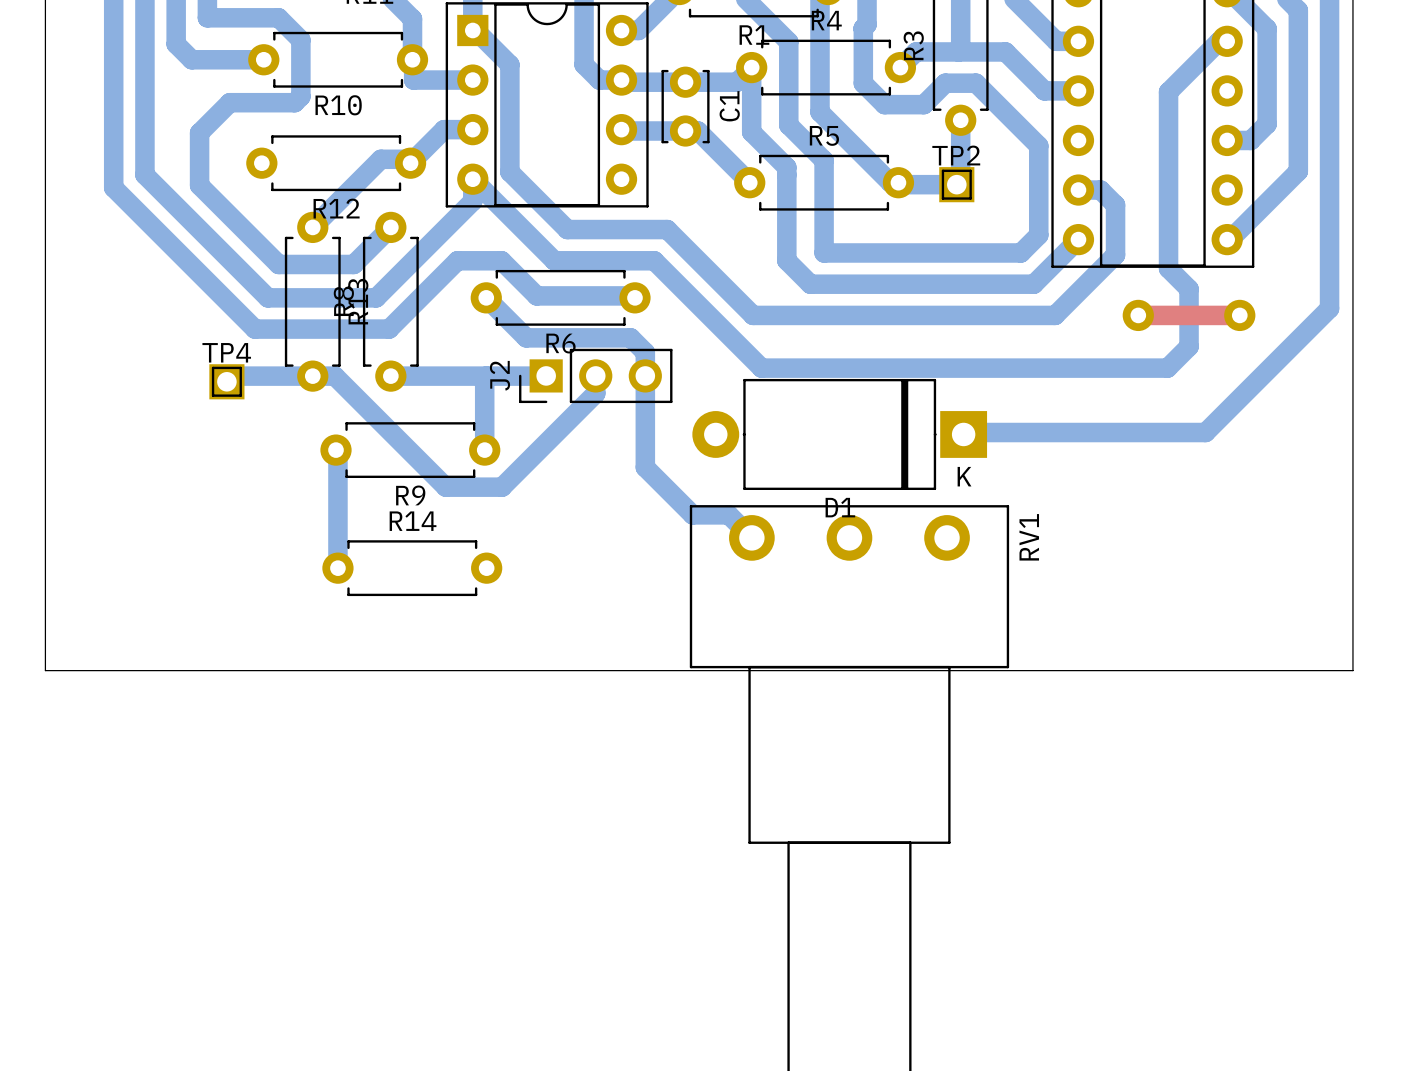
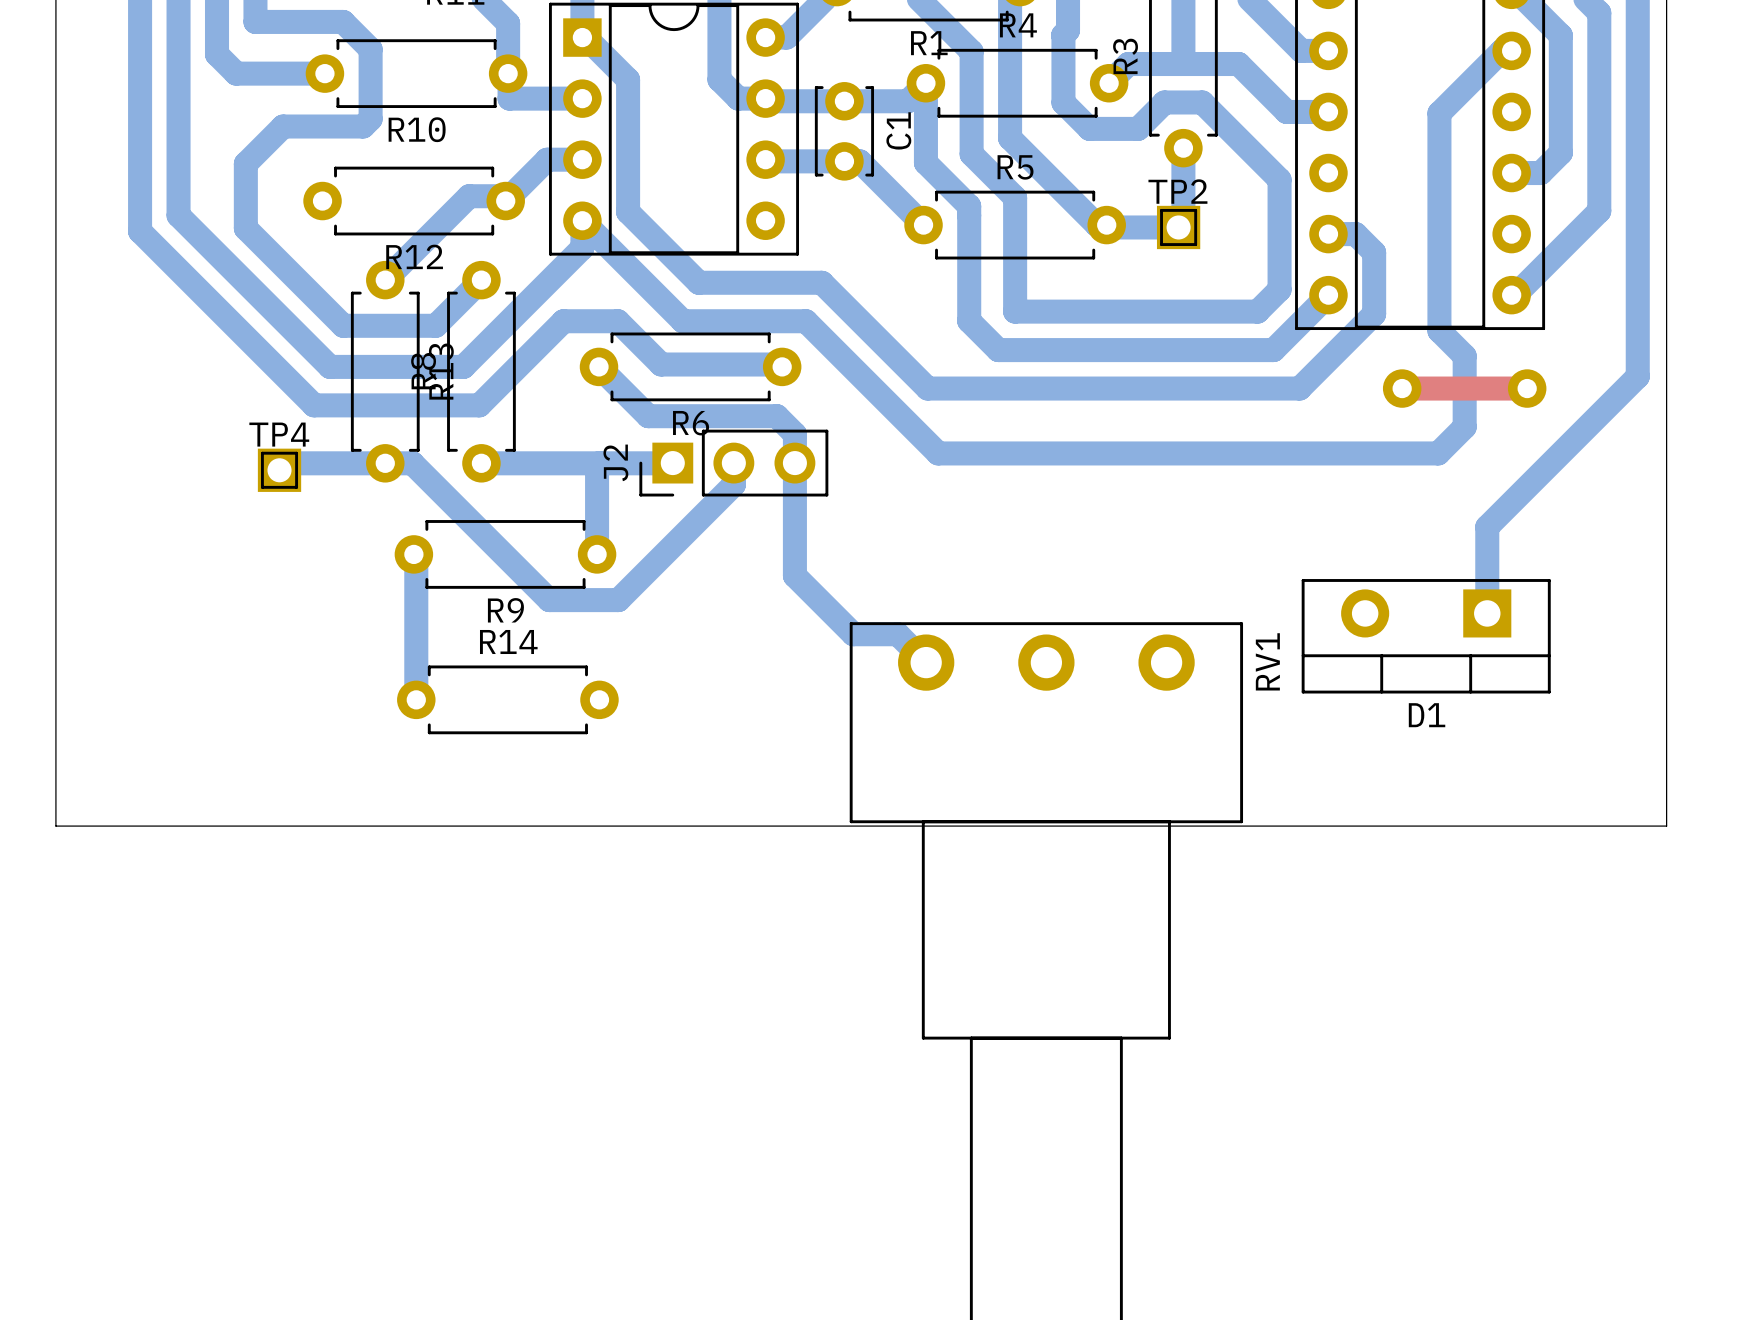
bottom track: (1329, 305) (1329, 308) (1205, 432) (965, 432) (963, 434) -> (1637, 376) (1487, 527) (1487, 613)
D1 footprint: [692, 378, 988, 490] -> [1301, 579, 1551, 694]

